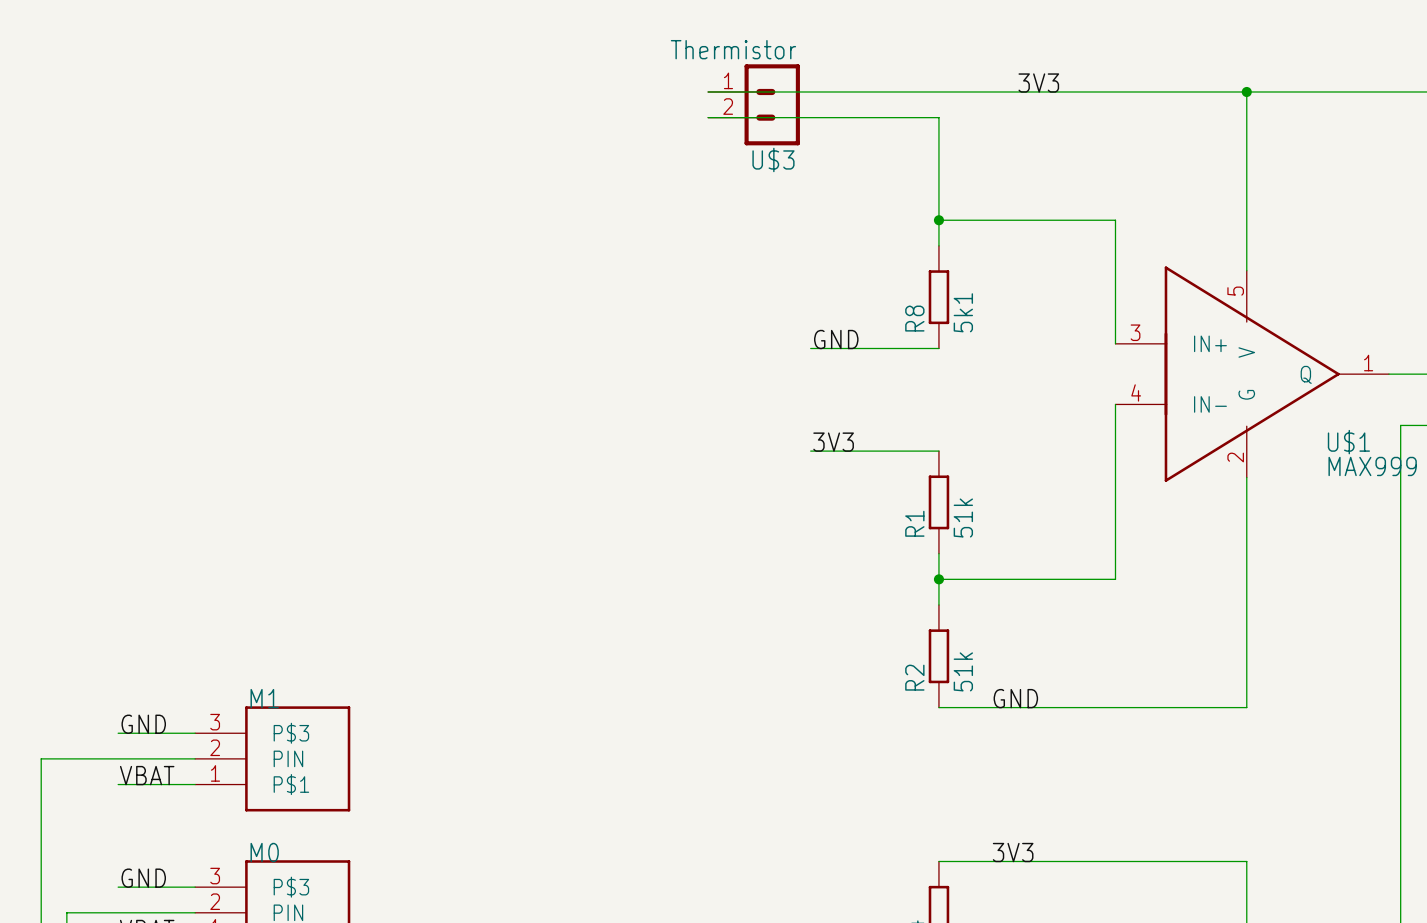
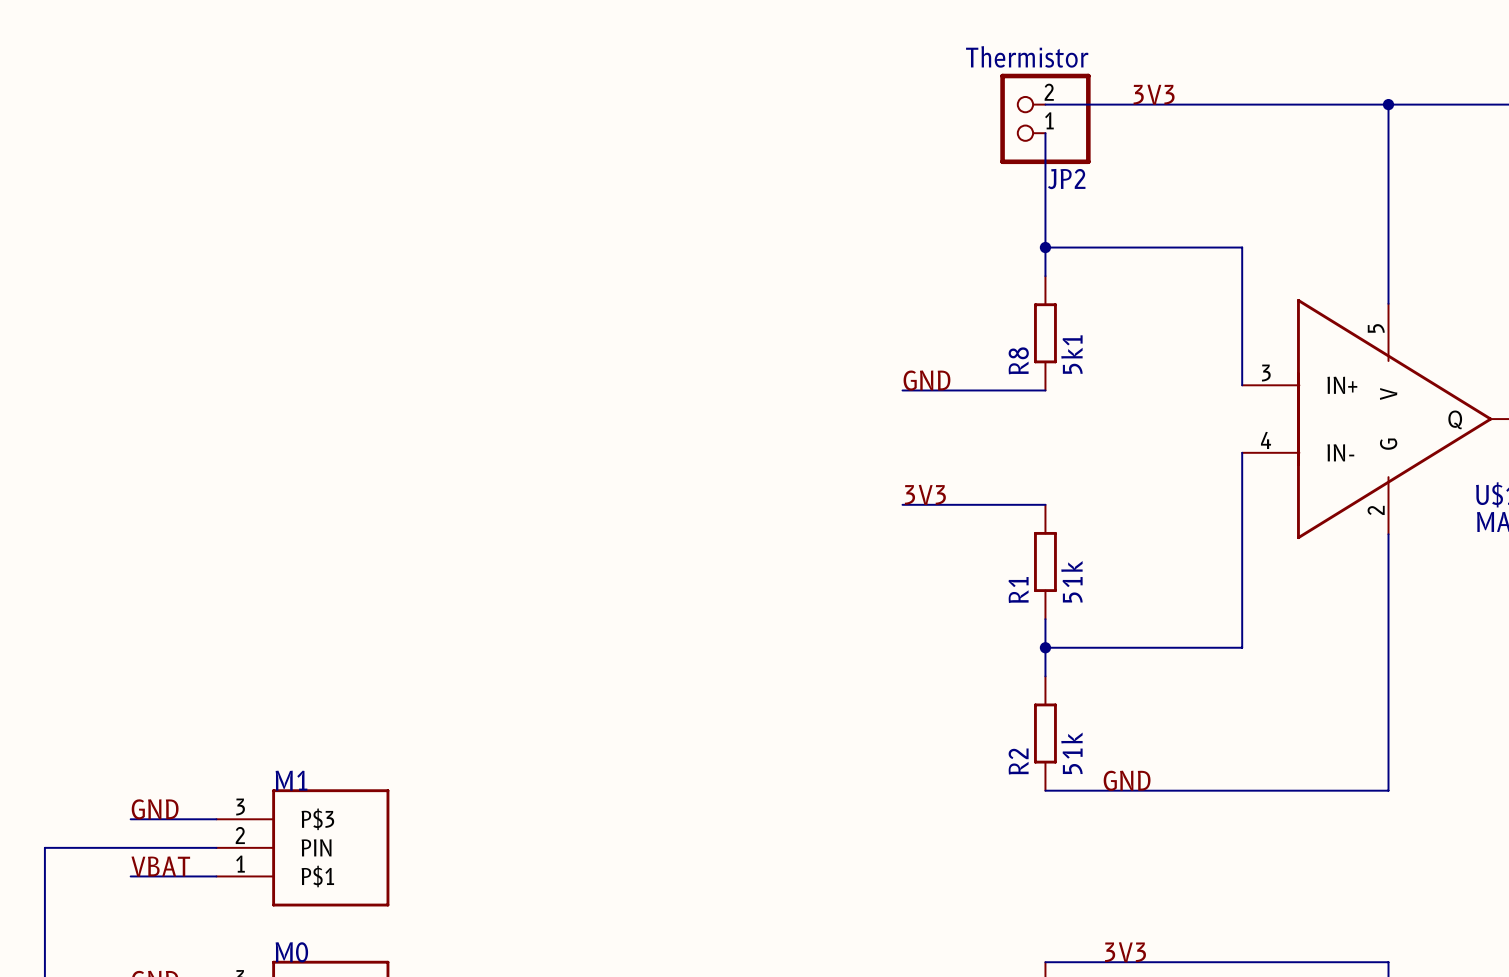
wire: (708, 91) (938, 91) -> none
U$3: Thermistor (754, 104) -> none
JP2: none -> Thermistor (1045, 118)
wire: (708, 117) (938, 117) -> none

